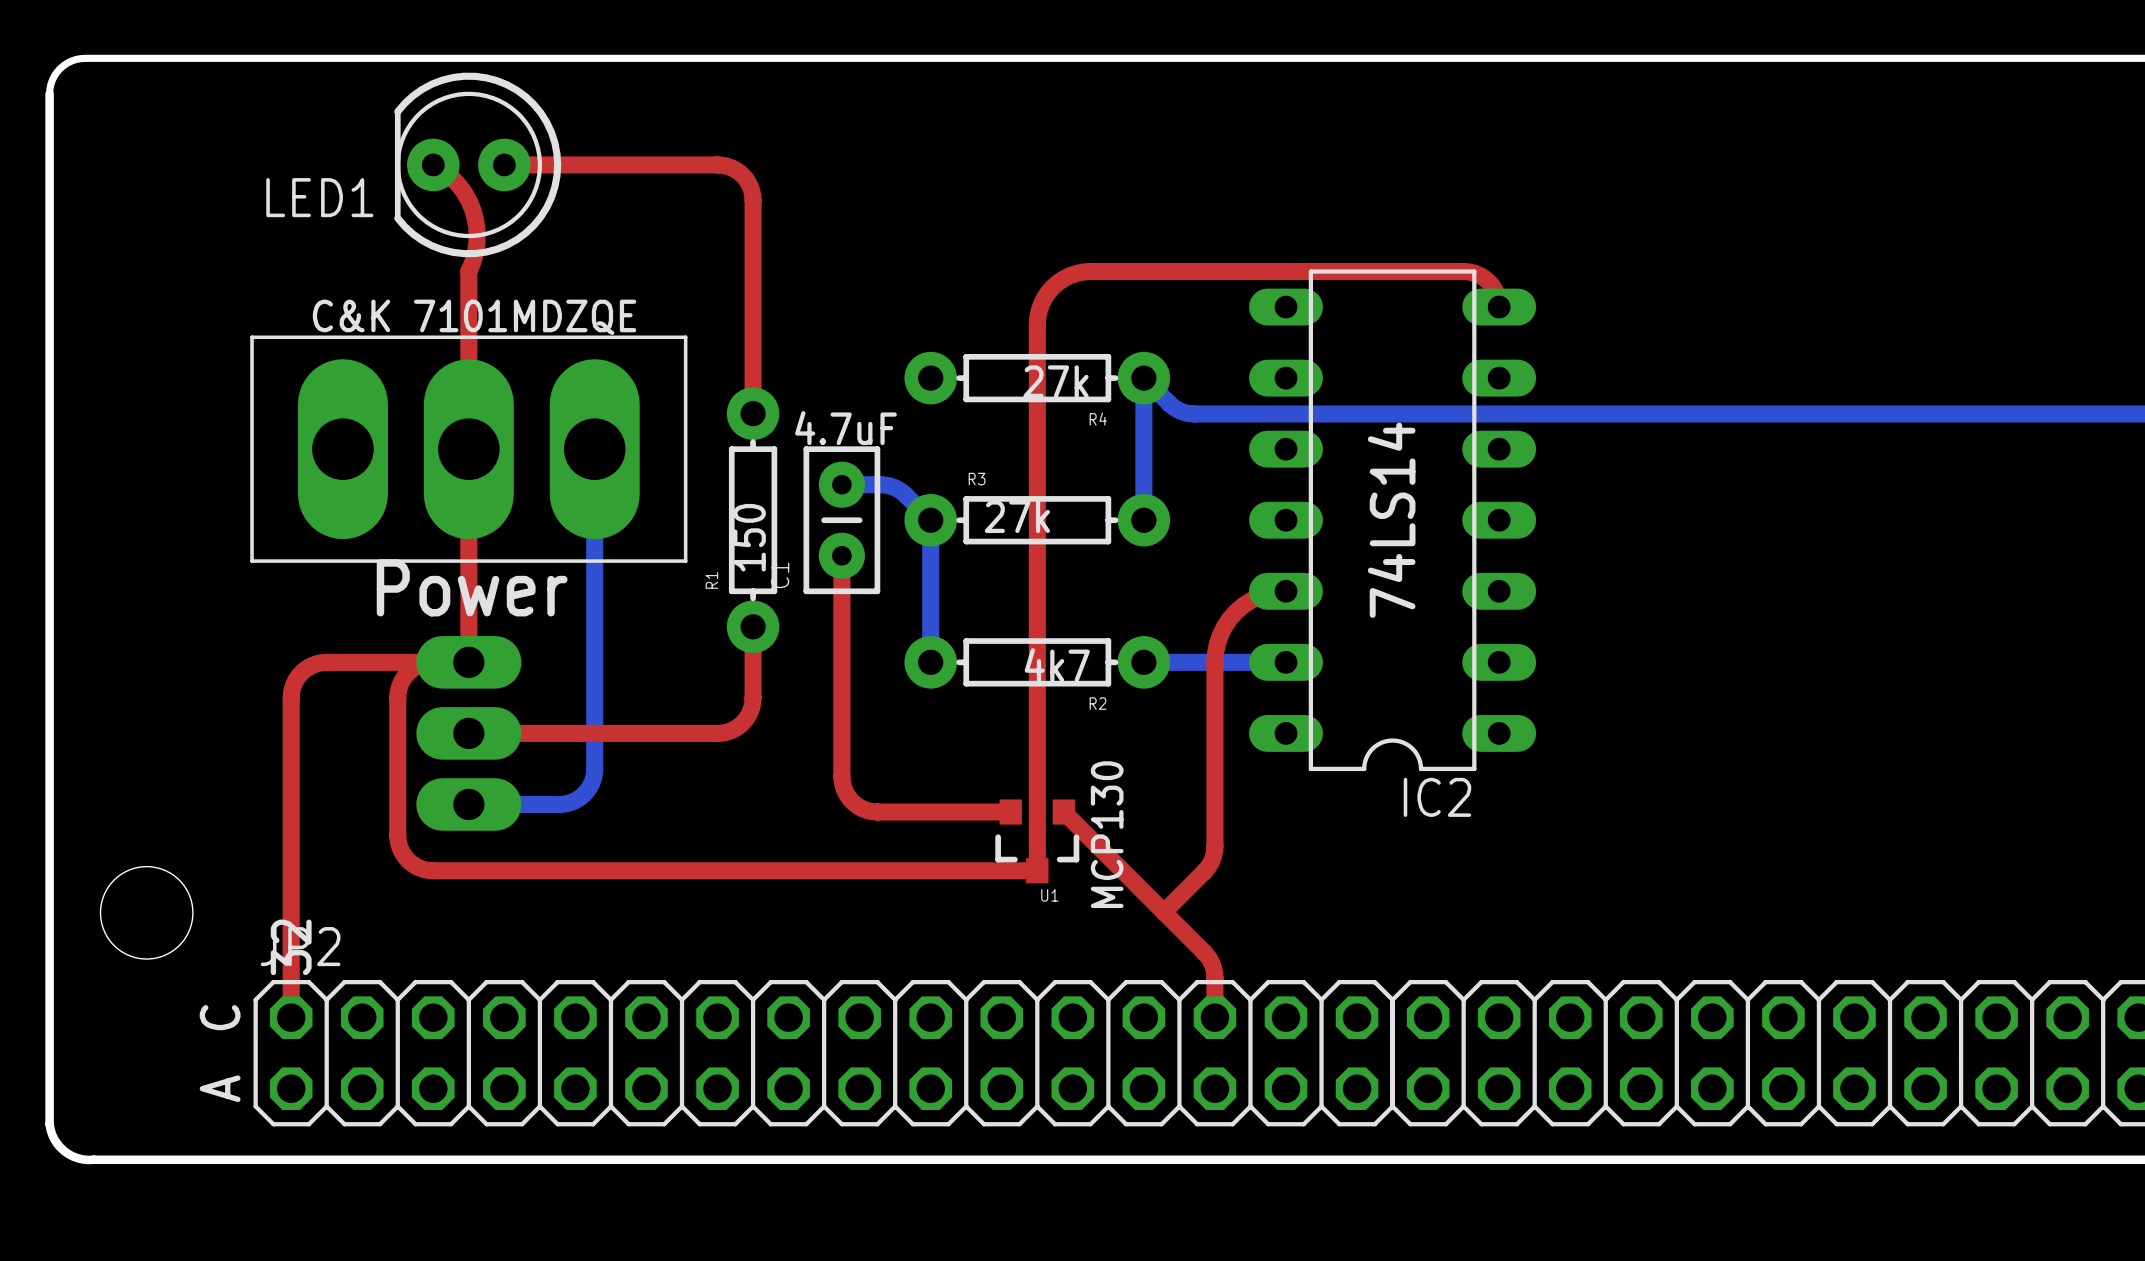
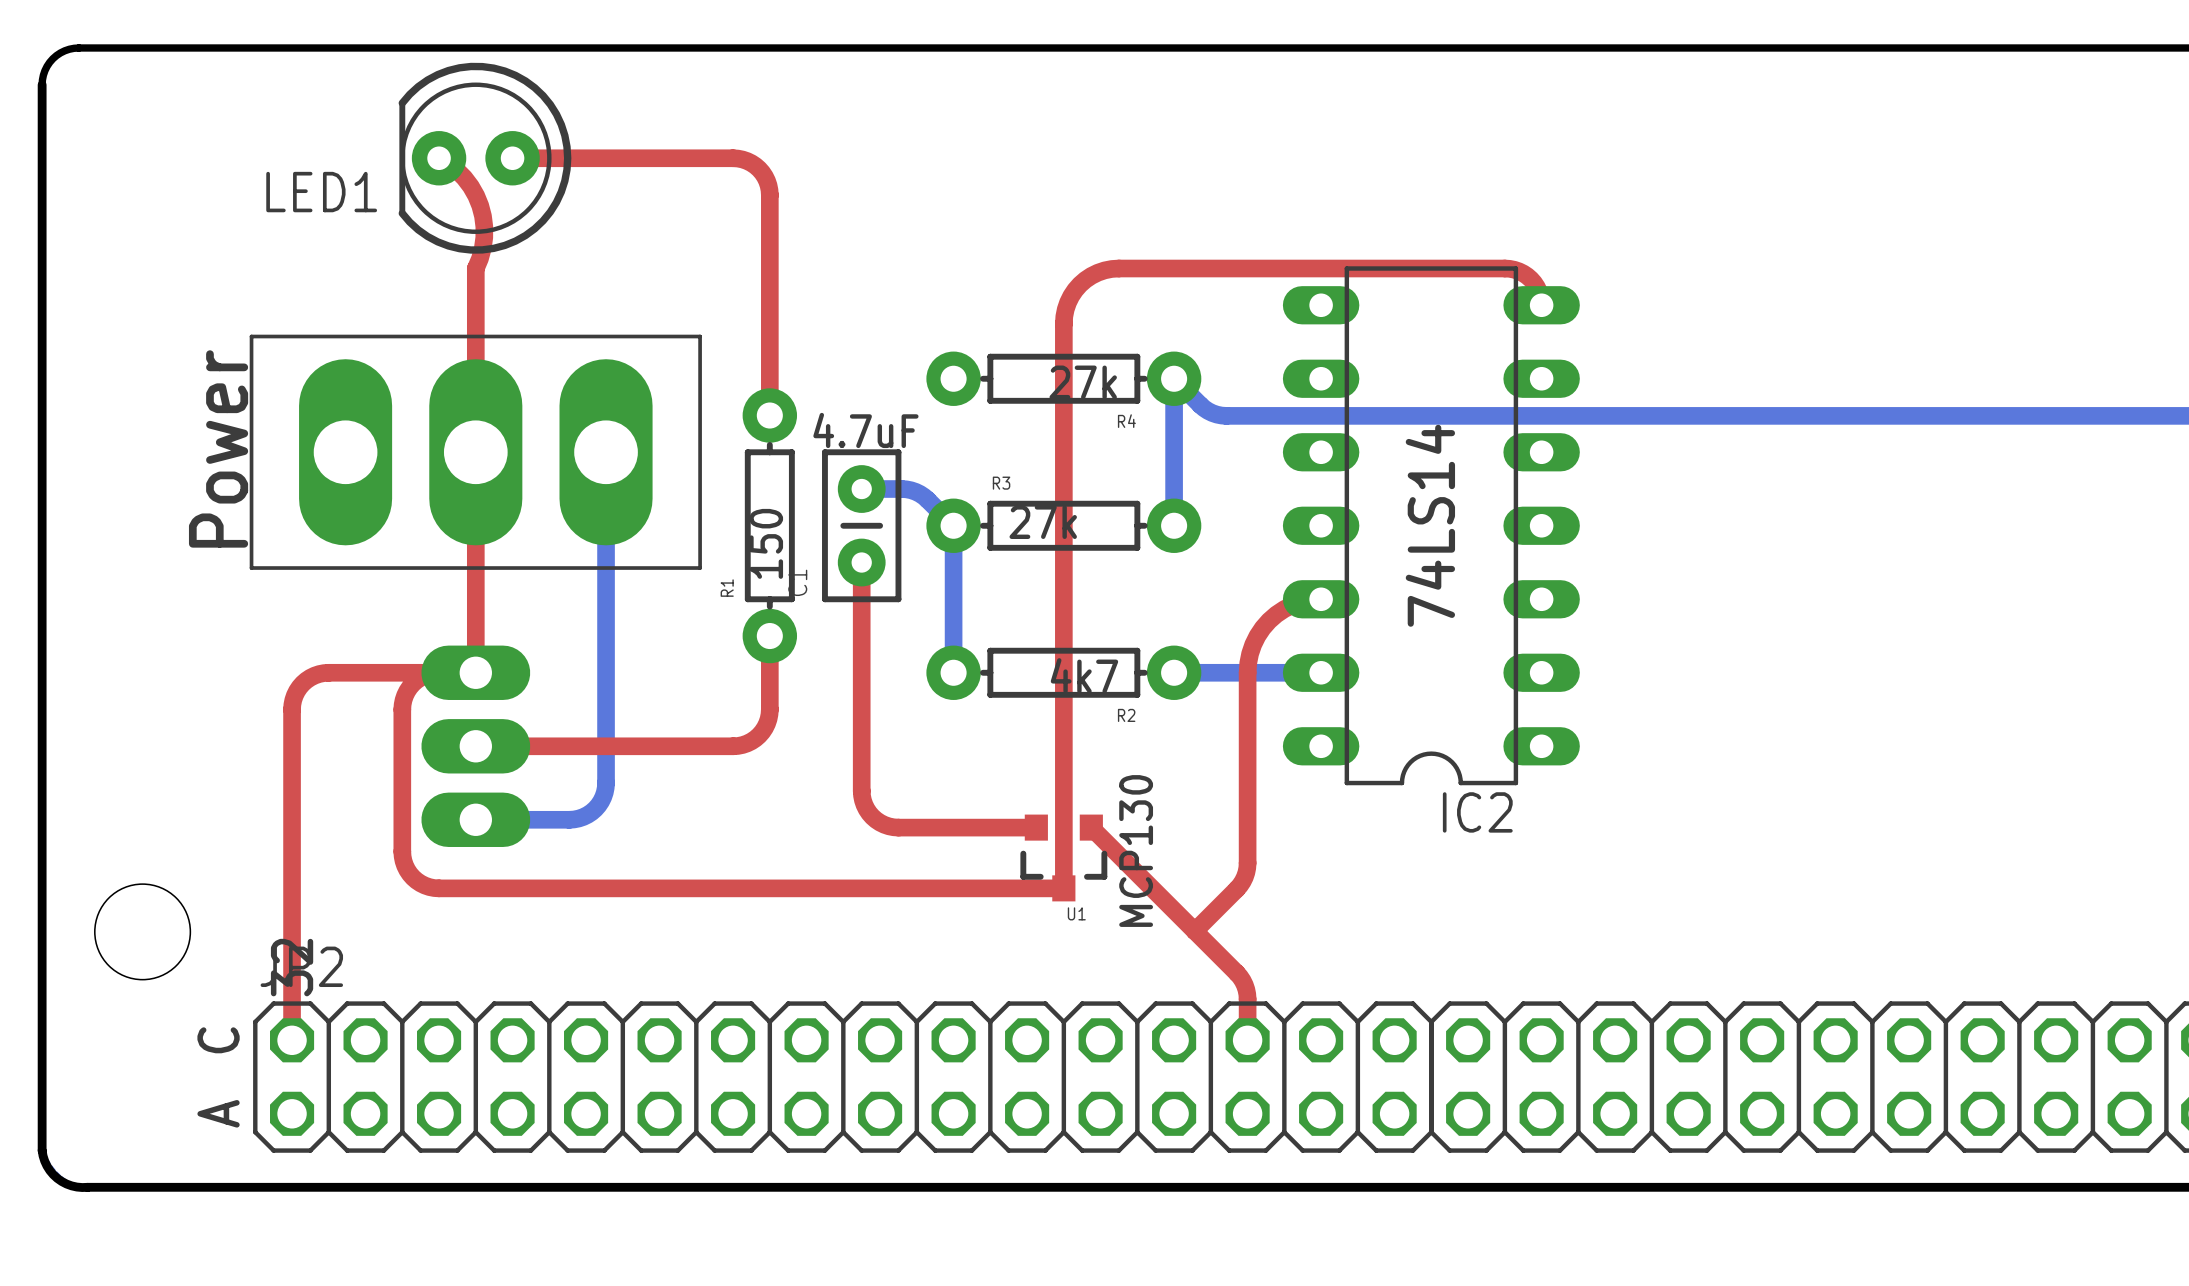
text: C&K 7101MDZQE (474, 317) -> none
text rotation: 0° (472, 587) -> 90° counterclockwise (218, 448)
text position: Power (472, 587) -> Power (218, 448)

